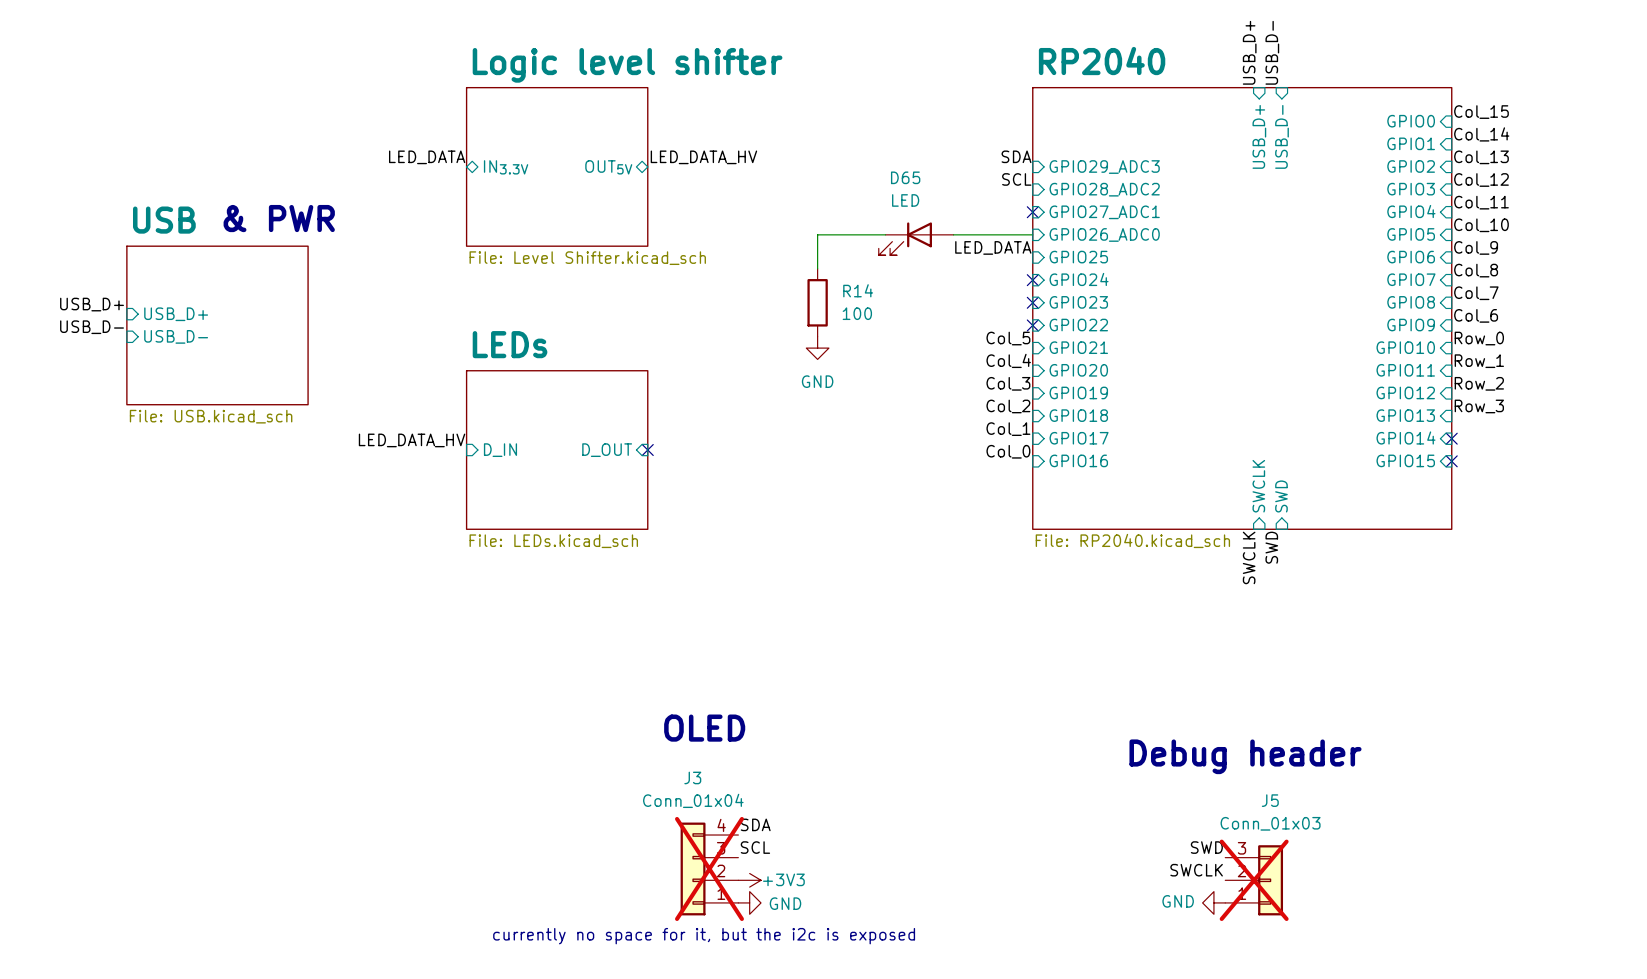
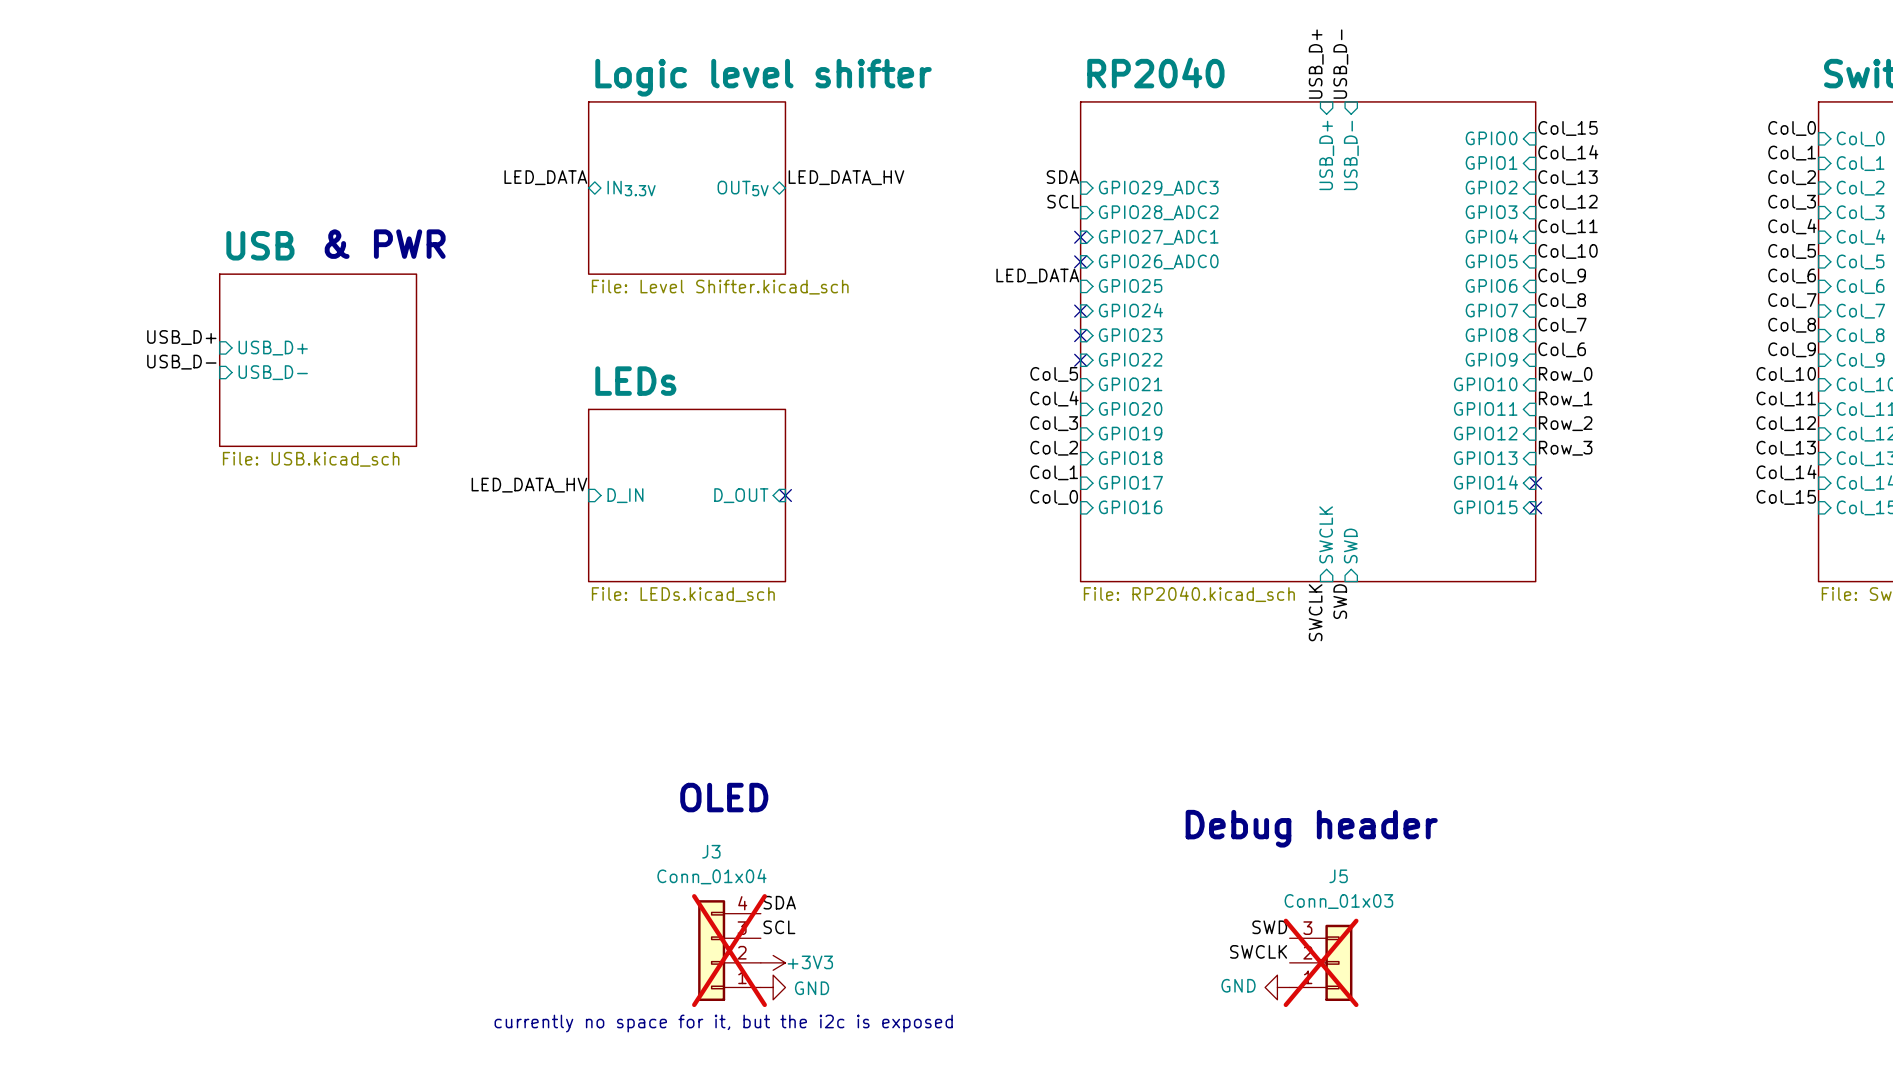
label position: LED_DATA (427, 157) -> LED_DATA (545, 177)
label position: LED_DATA_HV (703, 157) -> LED_DATA_HV (846, 177)
sheet Logic level shifter position: (557, 166) -> (687, 188)
sheet pin position: IN3.3V (506, 167) -> IN3.3V (631, 188)
sheet pin position: OUT5V (608, 167) -> OUT5V (743, 188)
text position: & PWR (279, 218) -> & PWR (385, 244)
wire: (885, 234) (817, 234) (817, 268) -> none
wire: (953, 234) (1032, 234) -> none
no-connect mark: none -> (1080, 261)
D65: LED (916, 238) -> none
R14: 100 (817, 302) -> none
label position: USB_D+ (92, 304) -> USB_D+ (181, 337)
sheet pin position: USB_D+ (176, 314) -> USB_D+ (273, 348)
sheet USB position: (217, 325) -> (318, 360)
label position: USB_D- (92, 327) -> USB_D- (181, 362)
sheet pin position: USB_D- (176, 336) -> USB_D- (273, 372)
power symbol: GND (817, 348) -> none
label position: LED_DATA_HV (412, 440) -> LED_DATA_HV (529, 485)
sheet pin position: D_IN (500, 450) -> D_IN (625, 495)
sheet LEDs position: (557, 450) -> (687, 495)
sheet pin position: D_OUT (607, 450) -> D_OUT (741, 495)
no-connect mark: (647, 450) -> none
no-connect mark: none -> (785, 495)

